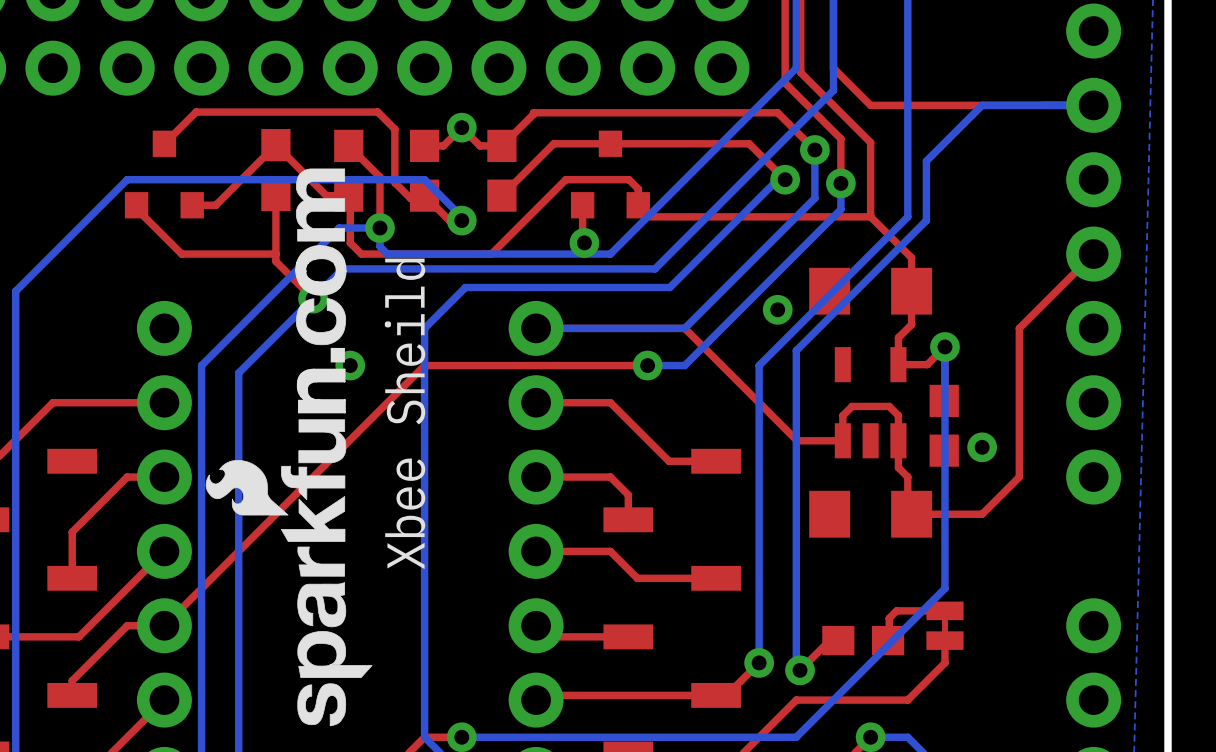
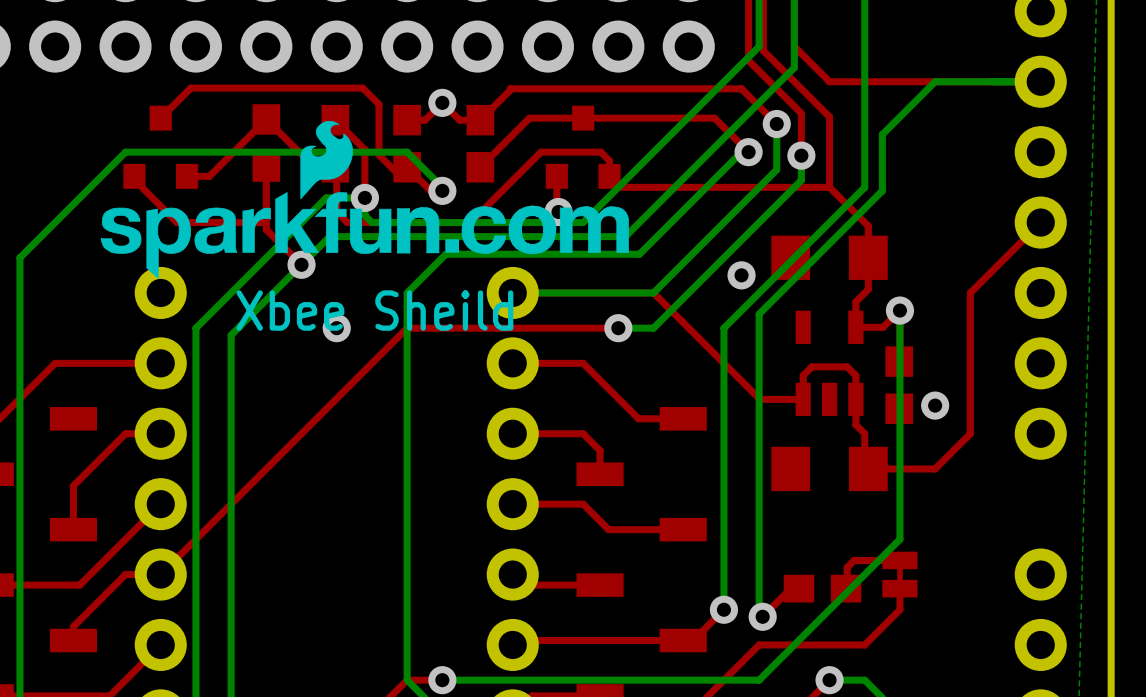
drawing: none -> [100, 120, 629, 279]
drawing: [205, 168, 373, 727] -> none
text rotation: 0° (405, 413) -> 90° clockwise (374, 310)

